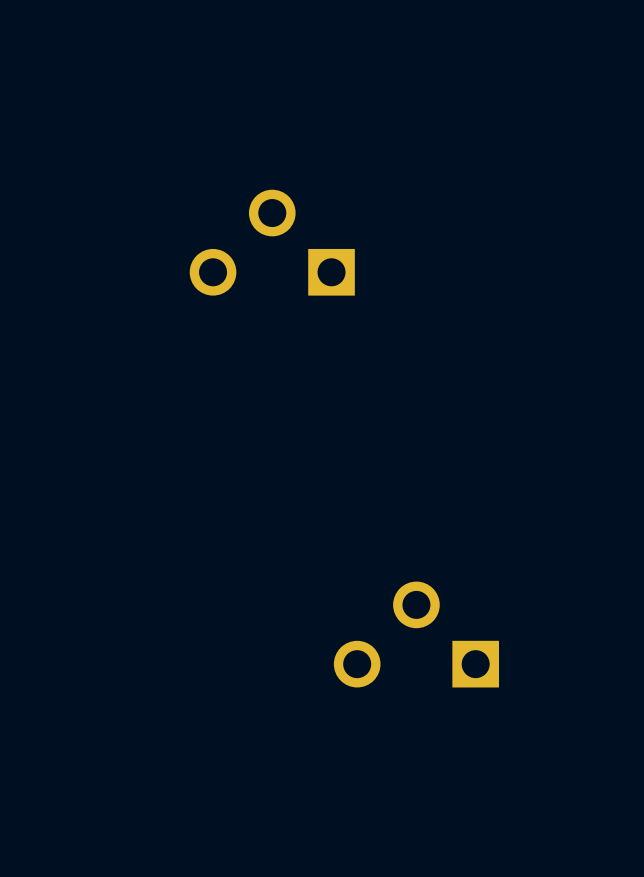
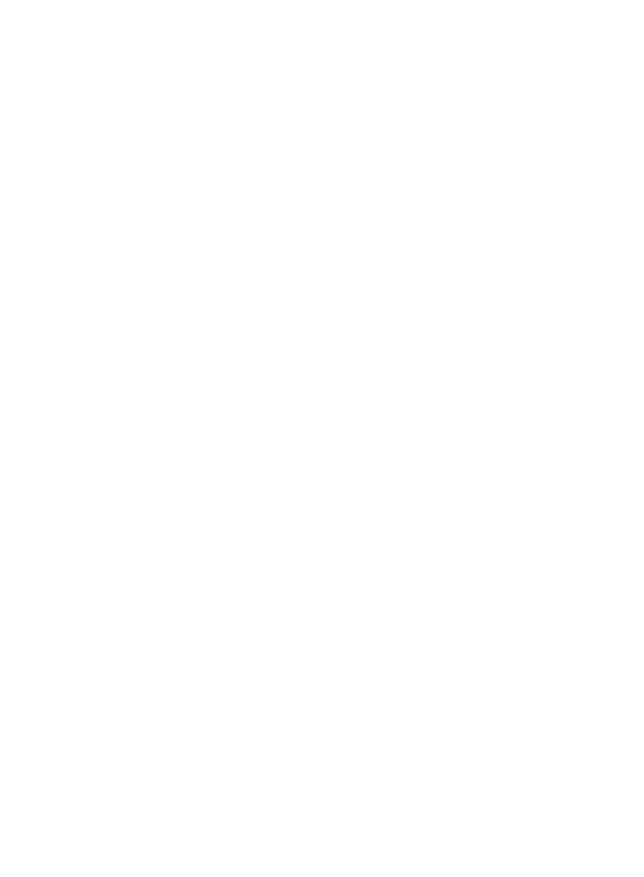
part: (272, 242) -> none
part: (416, 634) -> none

